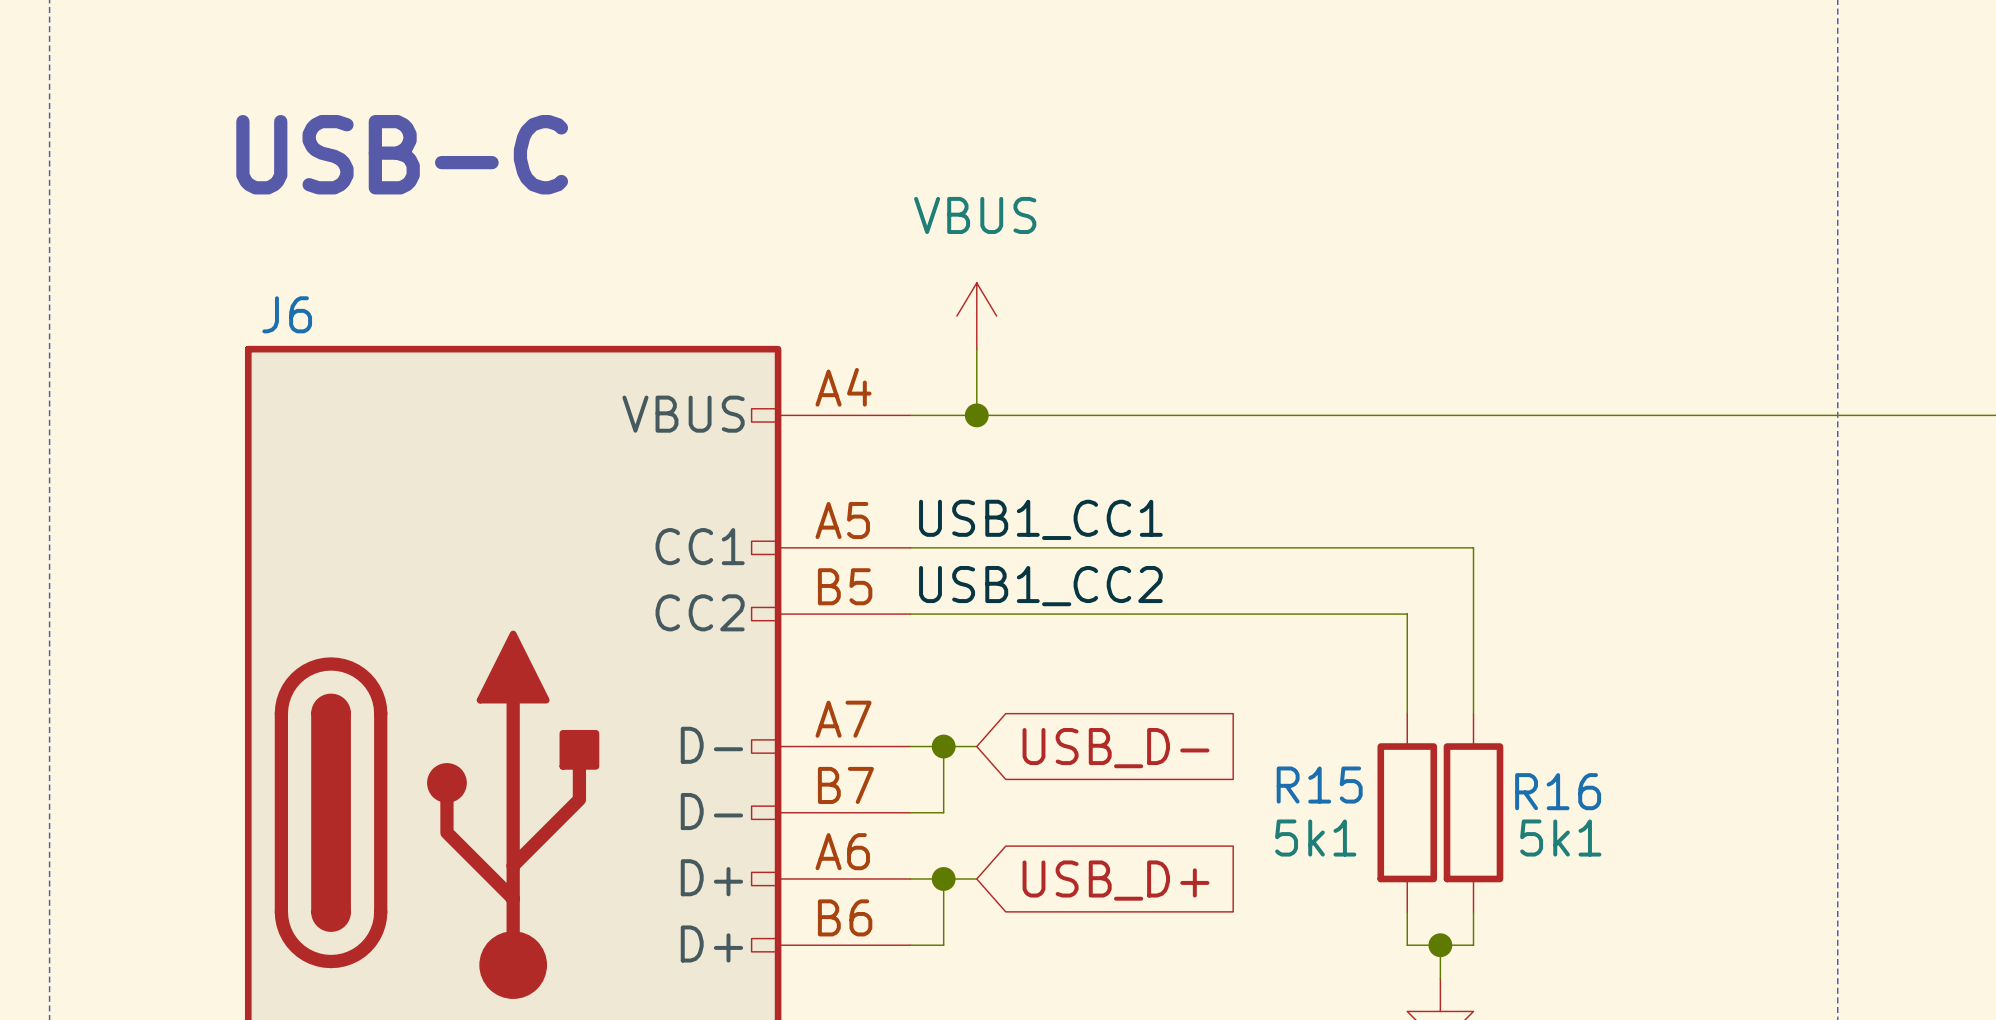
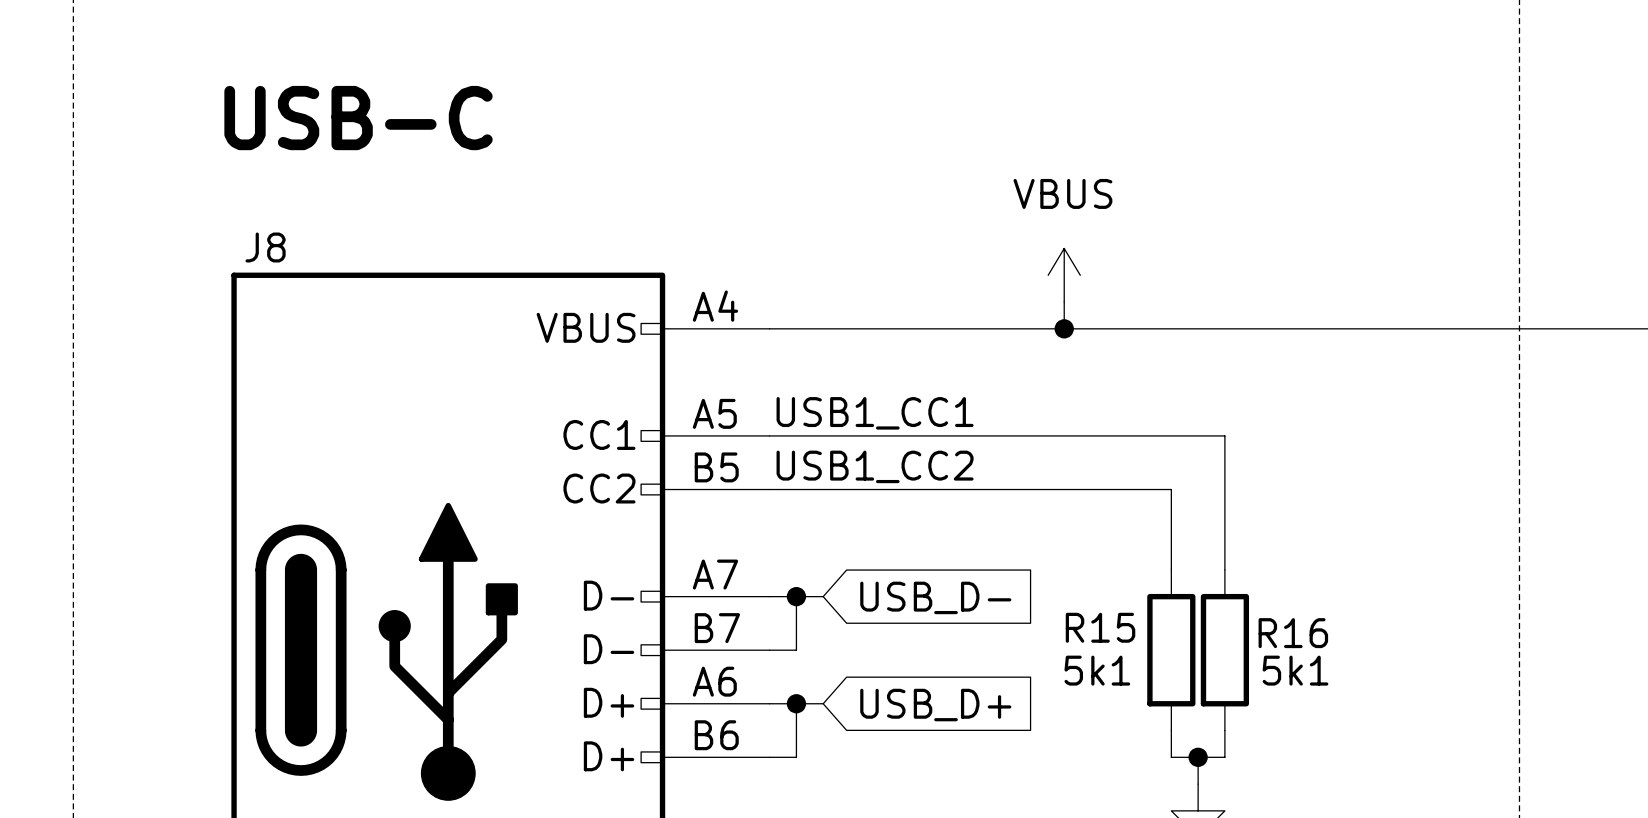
J6 name: J6 (287, 314) -> J8 (265, 247)
power symbol position: VBUS (976, 316) -> VBUS (1064, 275)
wire: (976, 349) (976, 415) -> none
wire: none -> (1064, 302) (1064, 328)
junction: (976, 415) -> none
junction: none -> (1064, 328)

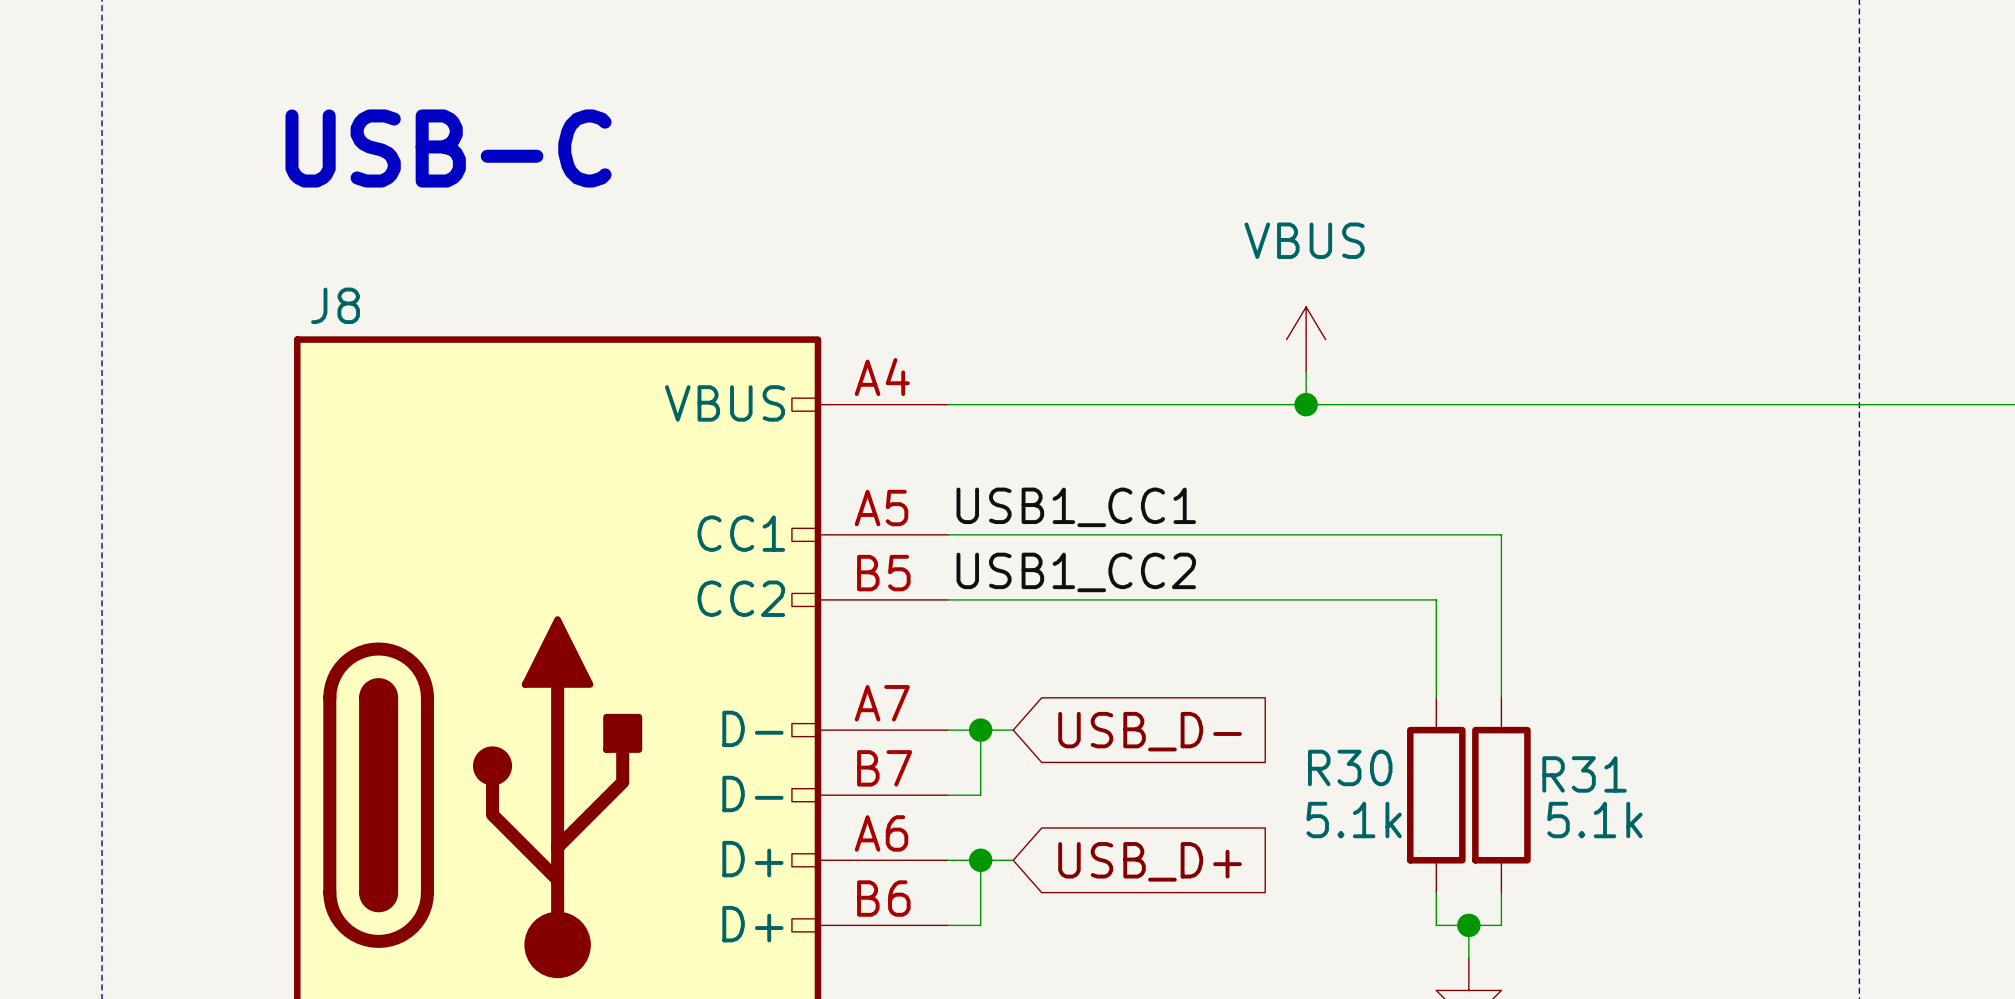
R15 name: R15 (1100, 627) -> R30 (1350, 767)
R16 name: R16 (1293, 633) -> R31 (1584, 774)
R15 value: 5k1 (1097, 670) -> 5.1k (1354, 820)
R16 value: 5k1 (1295, 670) -> 5.1k (1594, 820)

